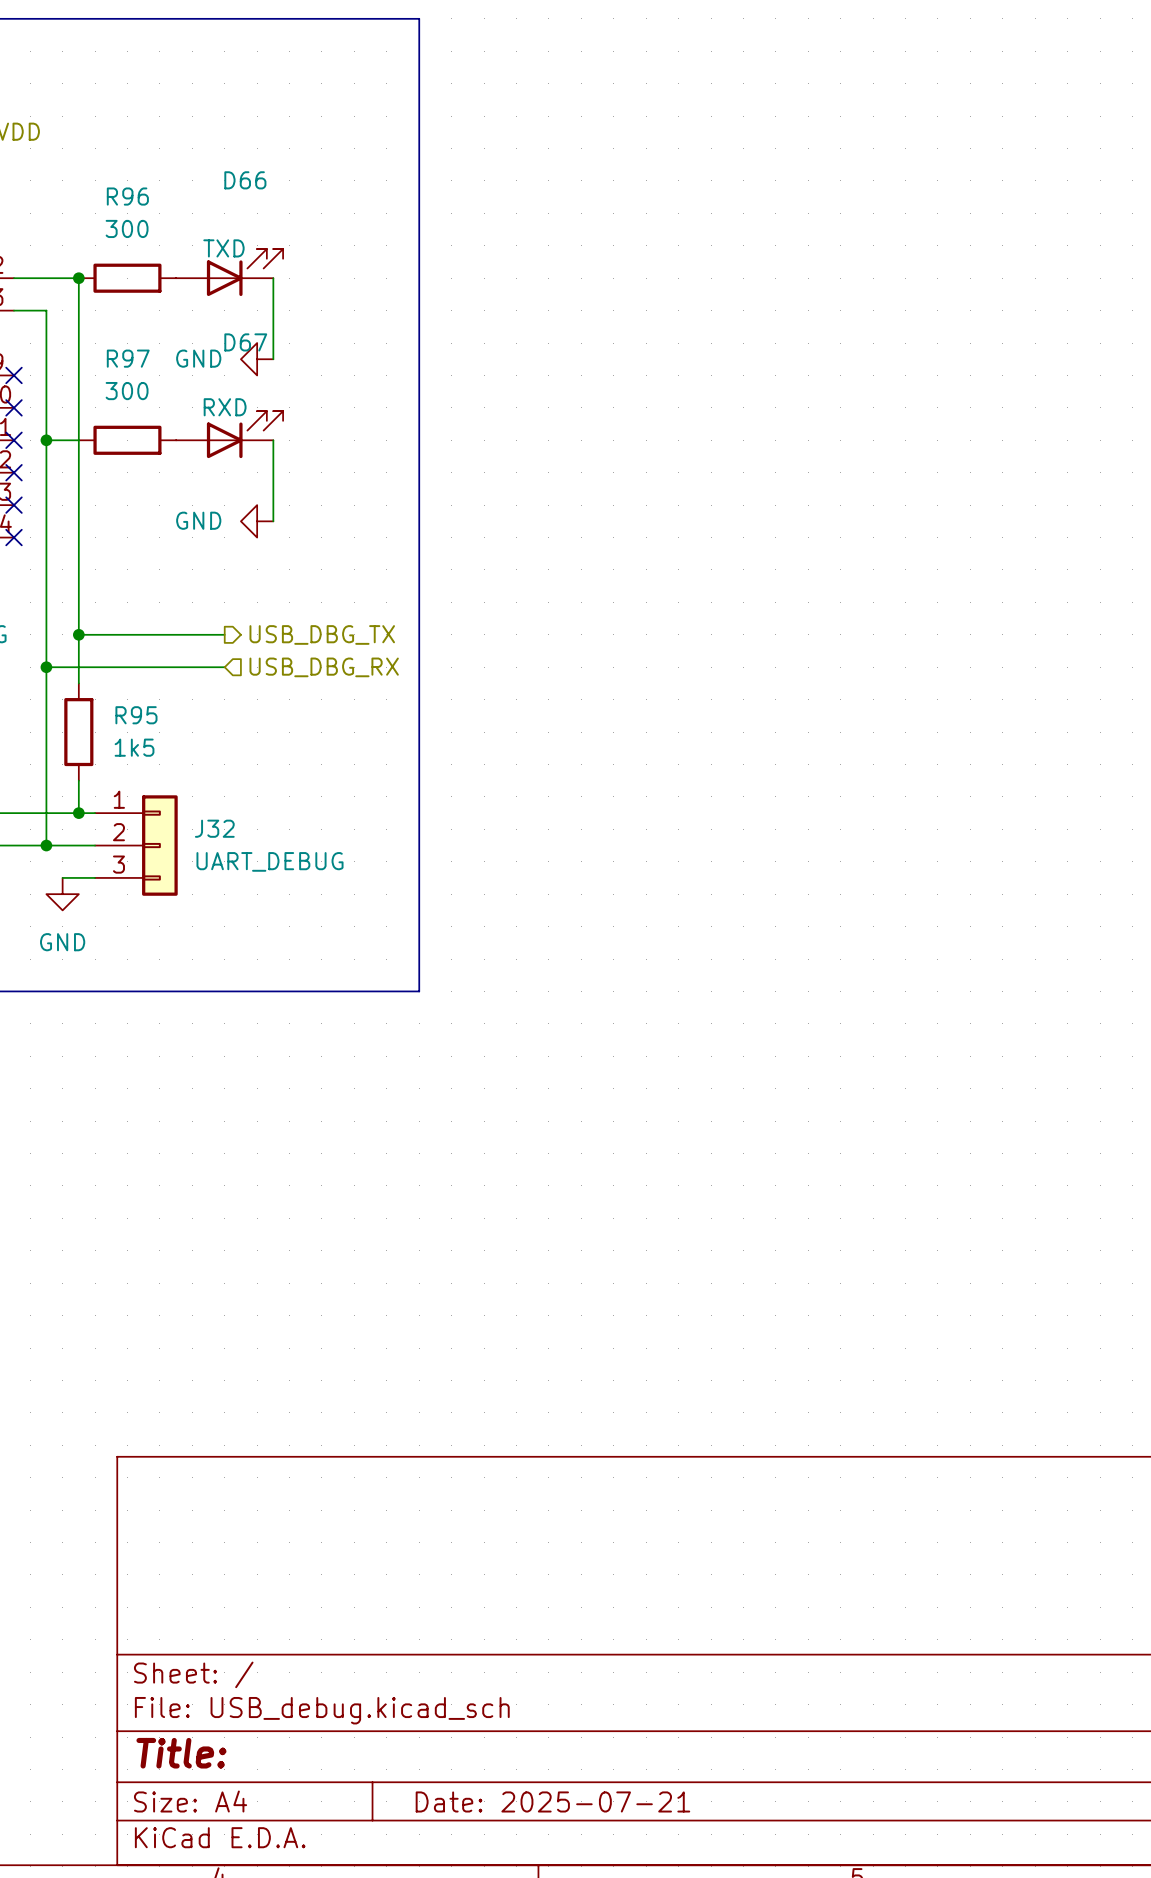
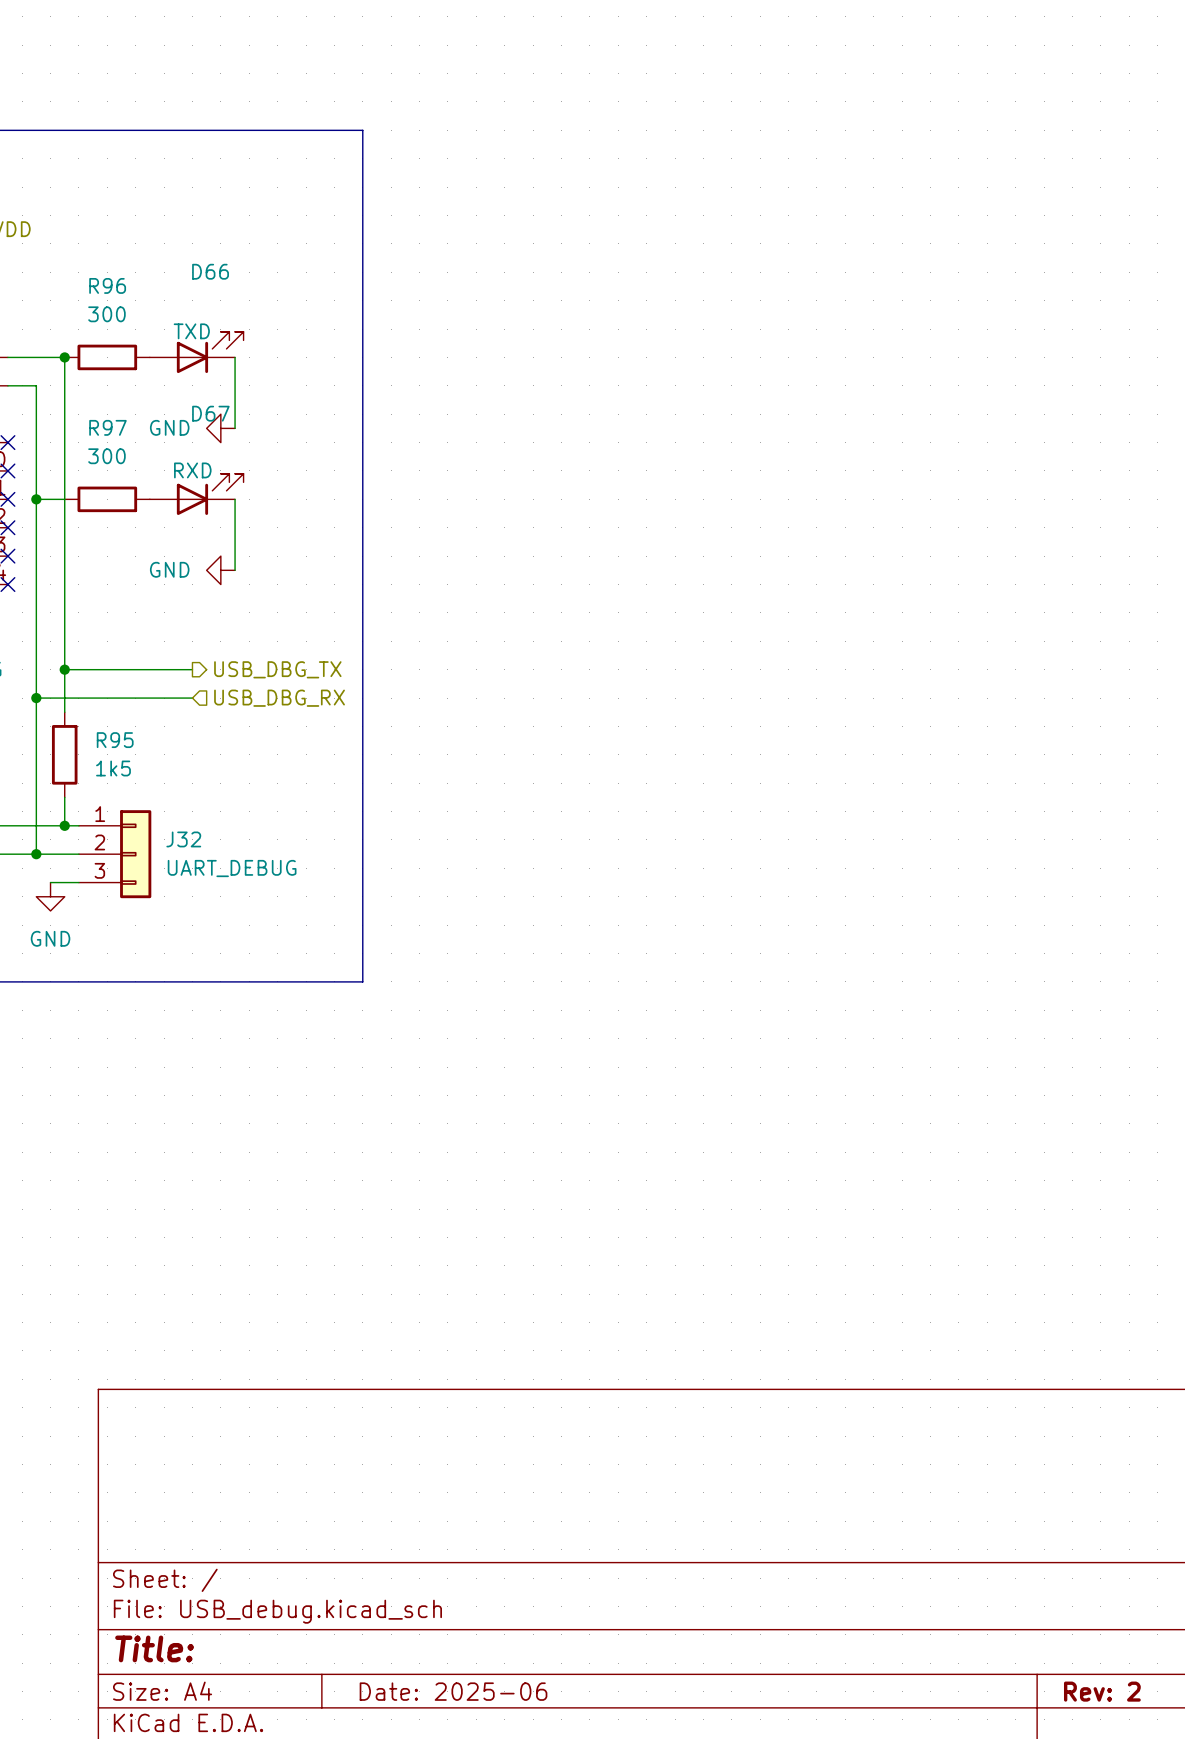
title block: Date: 2025-07-21 (552, 1801) -> Date: 2025-06 (453, 1691)

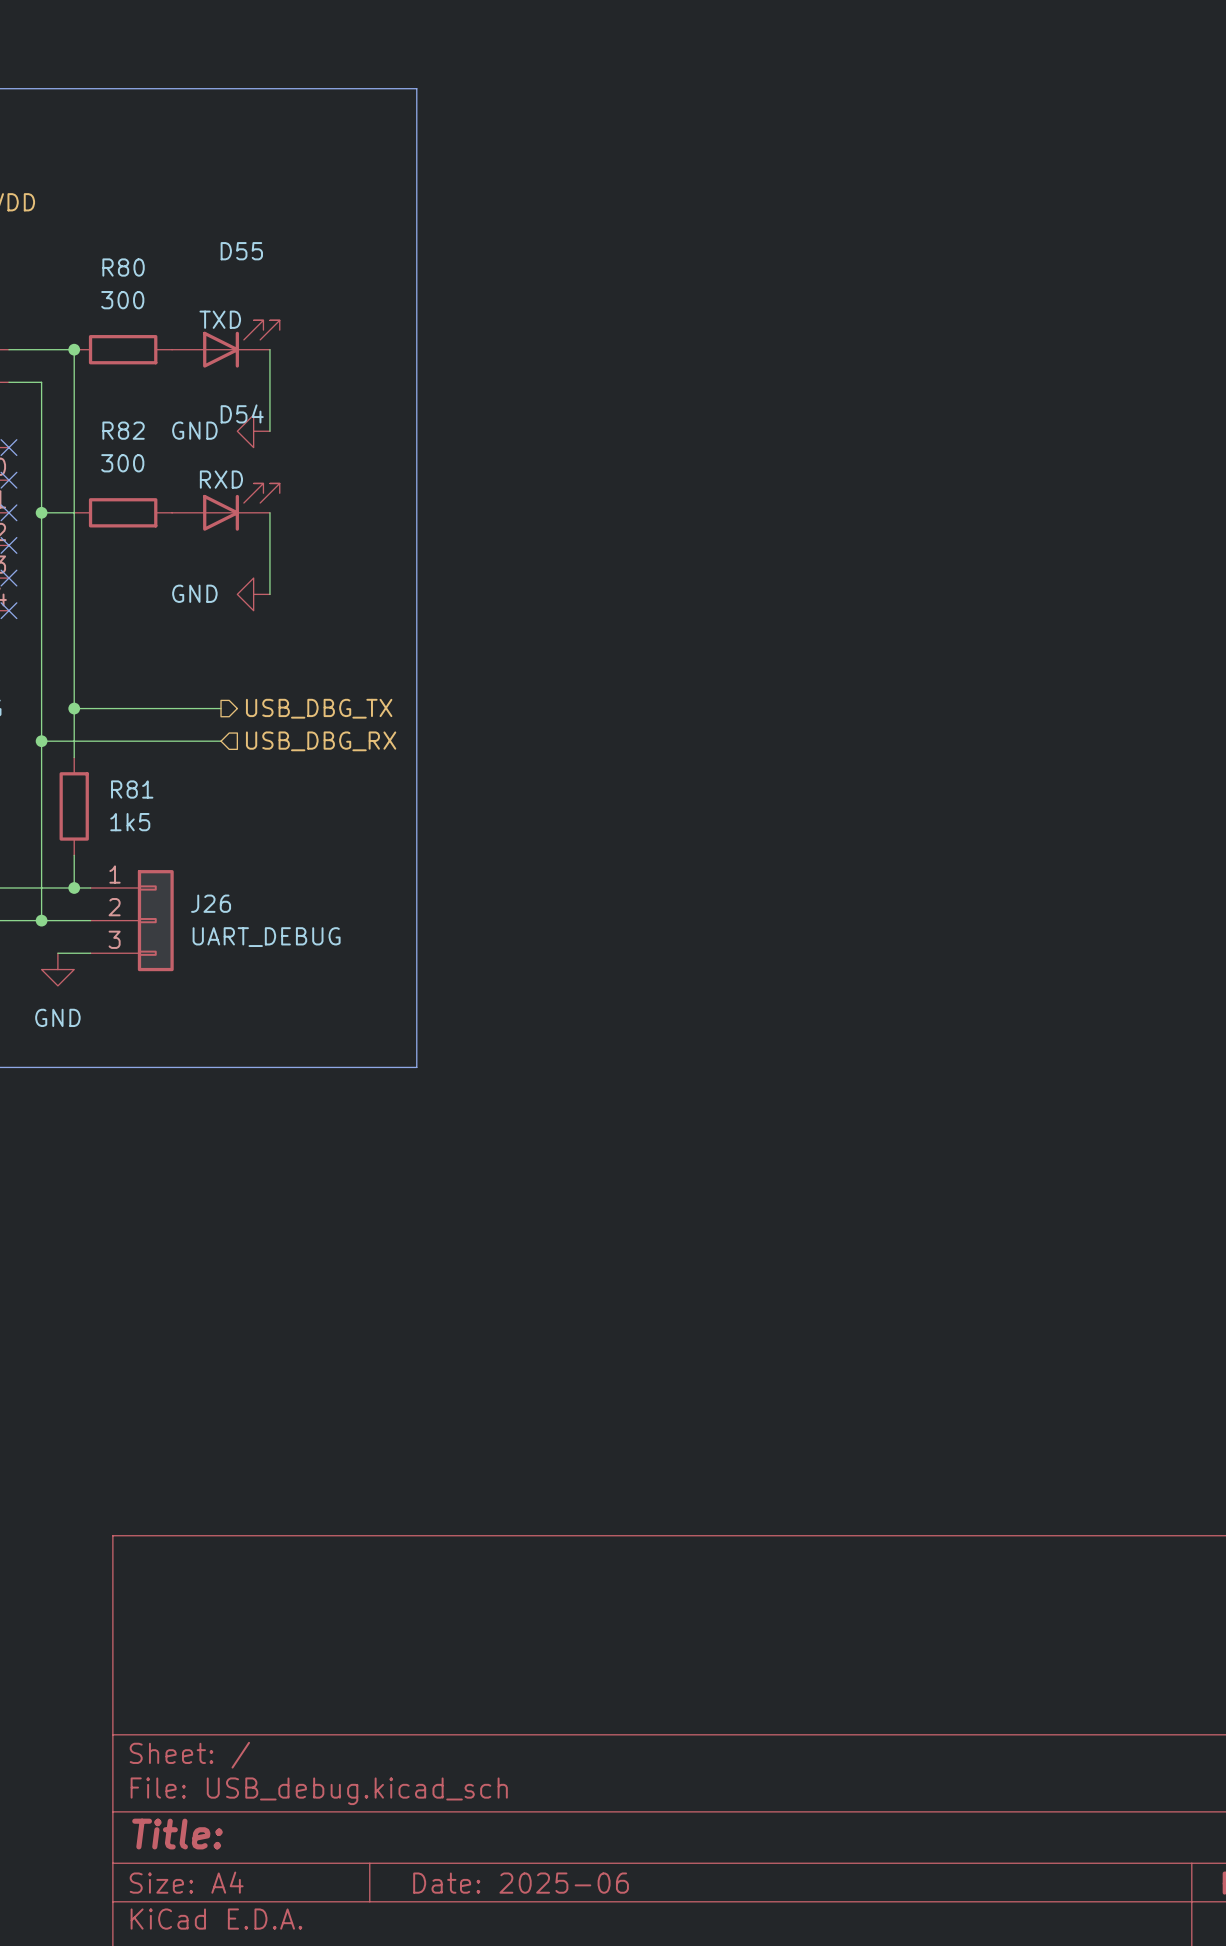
D66 name: D66 (210, 271) -> D55 (241, 251)
R96 name: R96 (107, 285) -> R80 (123, 267)
D67 name: D67 (210, 413) -> D54 (242, 413)
R97 name: R97 (107, 427) -> R82 (123, 430)
R95 name: R95 (115, 740) -> R81 (132, 789)
J32 name: J32 (183, 839) -> J26 (211, 903)

